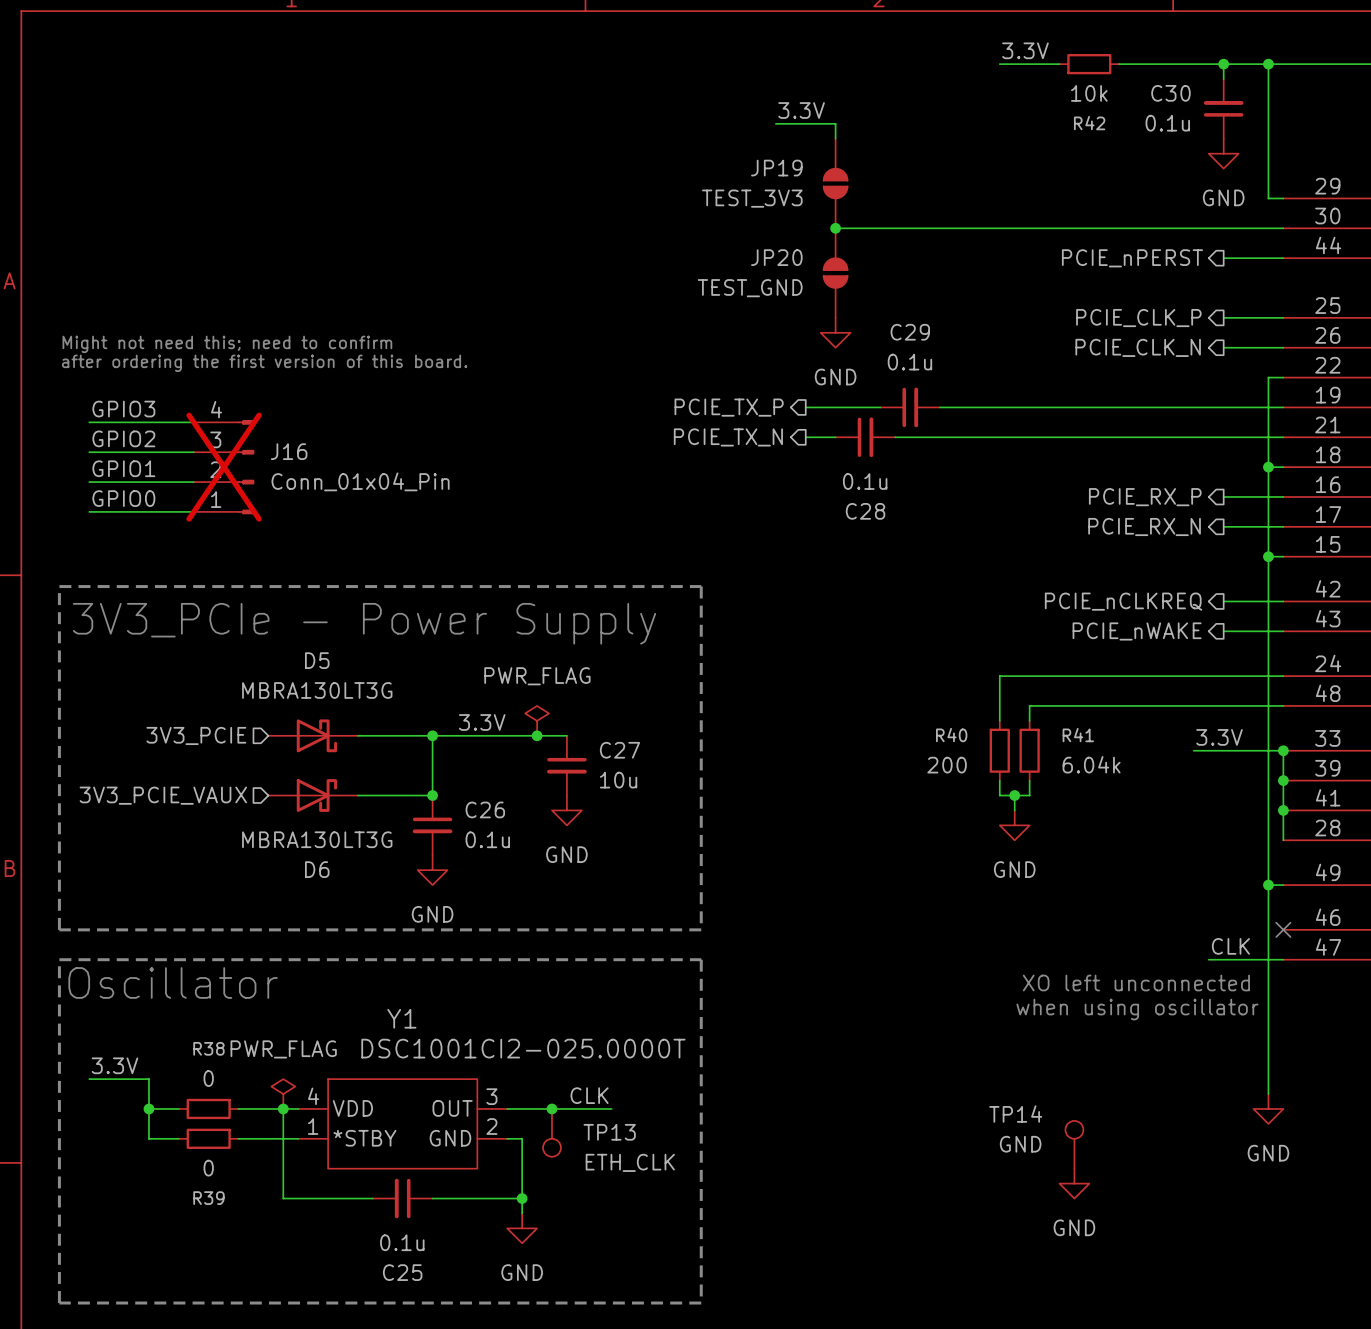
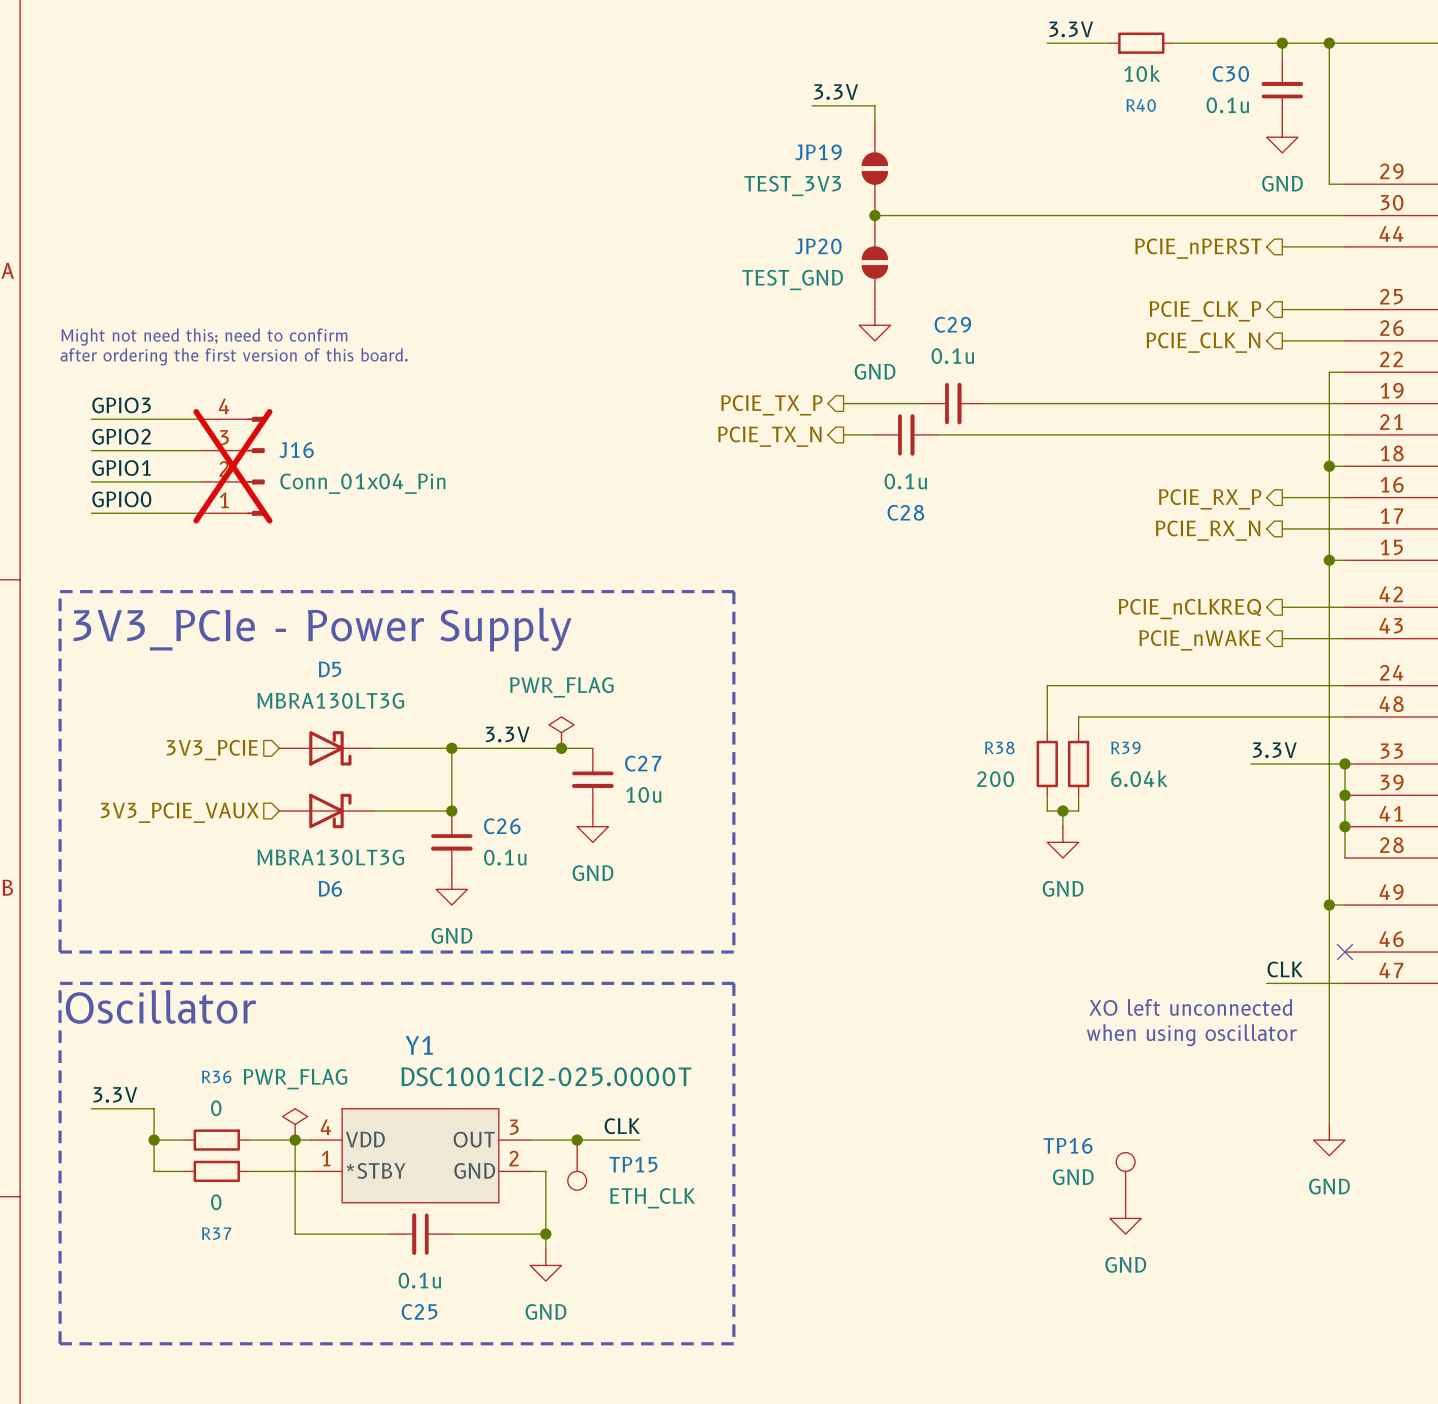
R42 name: R42 (1089, 123) -> R40 (1141, 105)
R40 name: R40 (951, 735) -> R38 (999, 747)
R41 name: R41 (1078, 735) -> R39 (1125, 747)
R38 name: R38 (208, 1048) -> R36 (216, 1077)
TP14 name: TP14 (1015, 1114) -> TP16 (1068, 1145)
TP13 name: TP13 (609, 1132) -> TP15 (633, 1164)
R39 name: R39 (208, 1198) -> R37 (216, 1233)

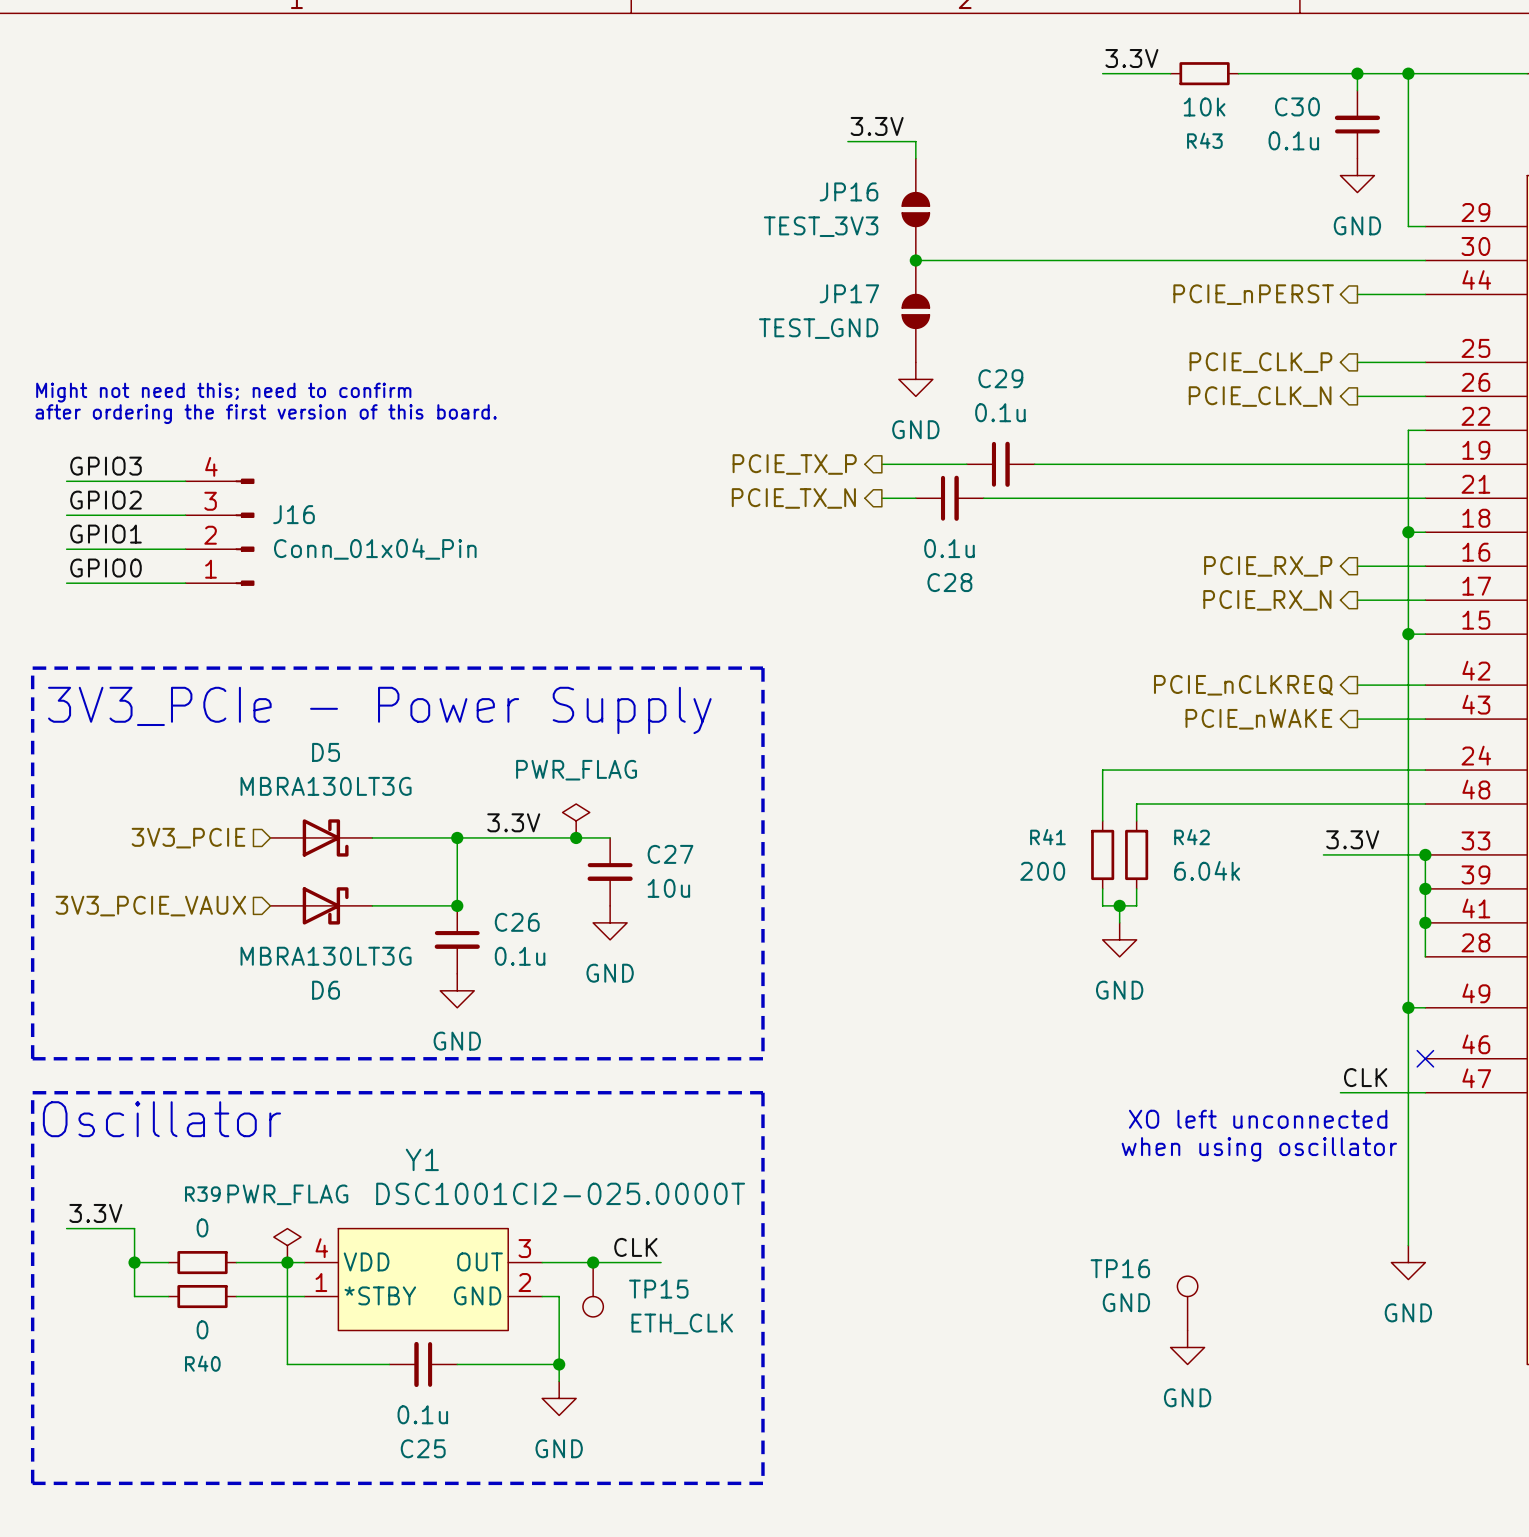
R40 name: R40 (1141, 105) -> R43 (1204, 140)
JP19 name: JP19 (818, 152) -> JP16 (848, 191)
JP20 name: JP20 (818, 246) -> JP17 (849, 293)
J16 do-not-place cross: (232, 466) -> none
R38 name: R38 (999, 747) -> R41 (1047, 837)
R39 name: R39 (1125, 747) -> R42 (1192, 837)
R36 name: R36 (216, 1077) -> R39 (202, 1194)
R37 name: R37 (216, 1233) -> R40 (202, 1363)

